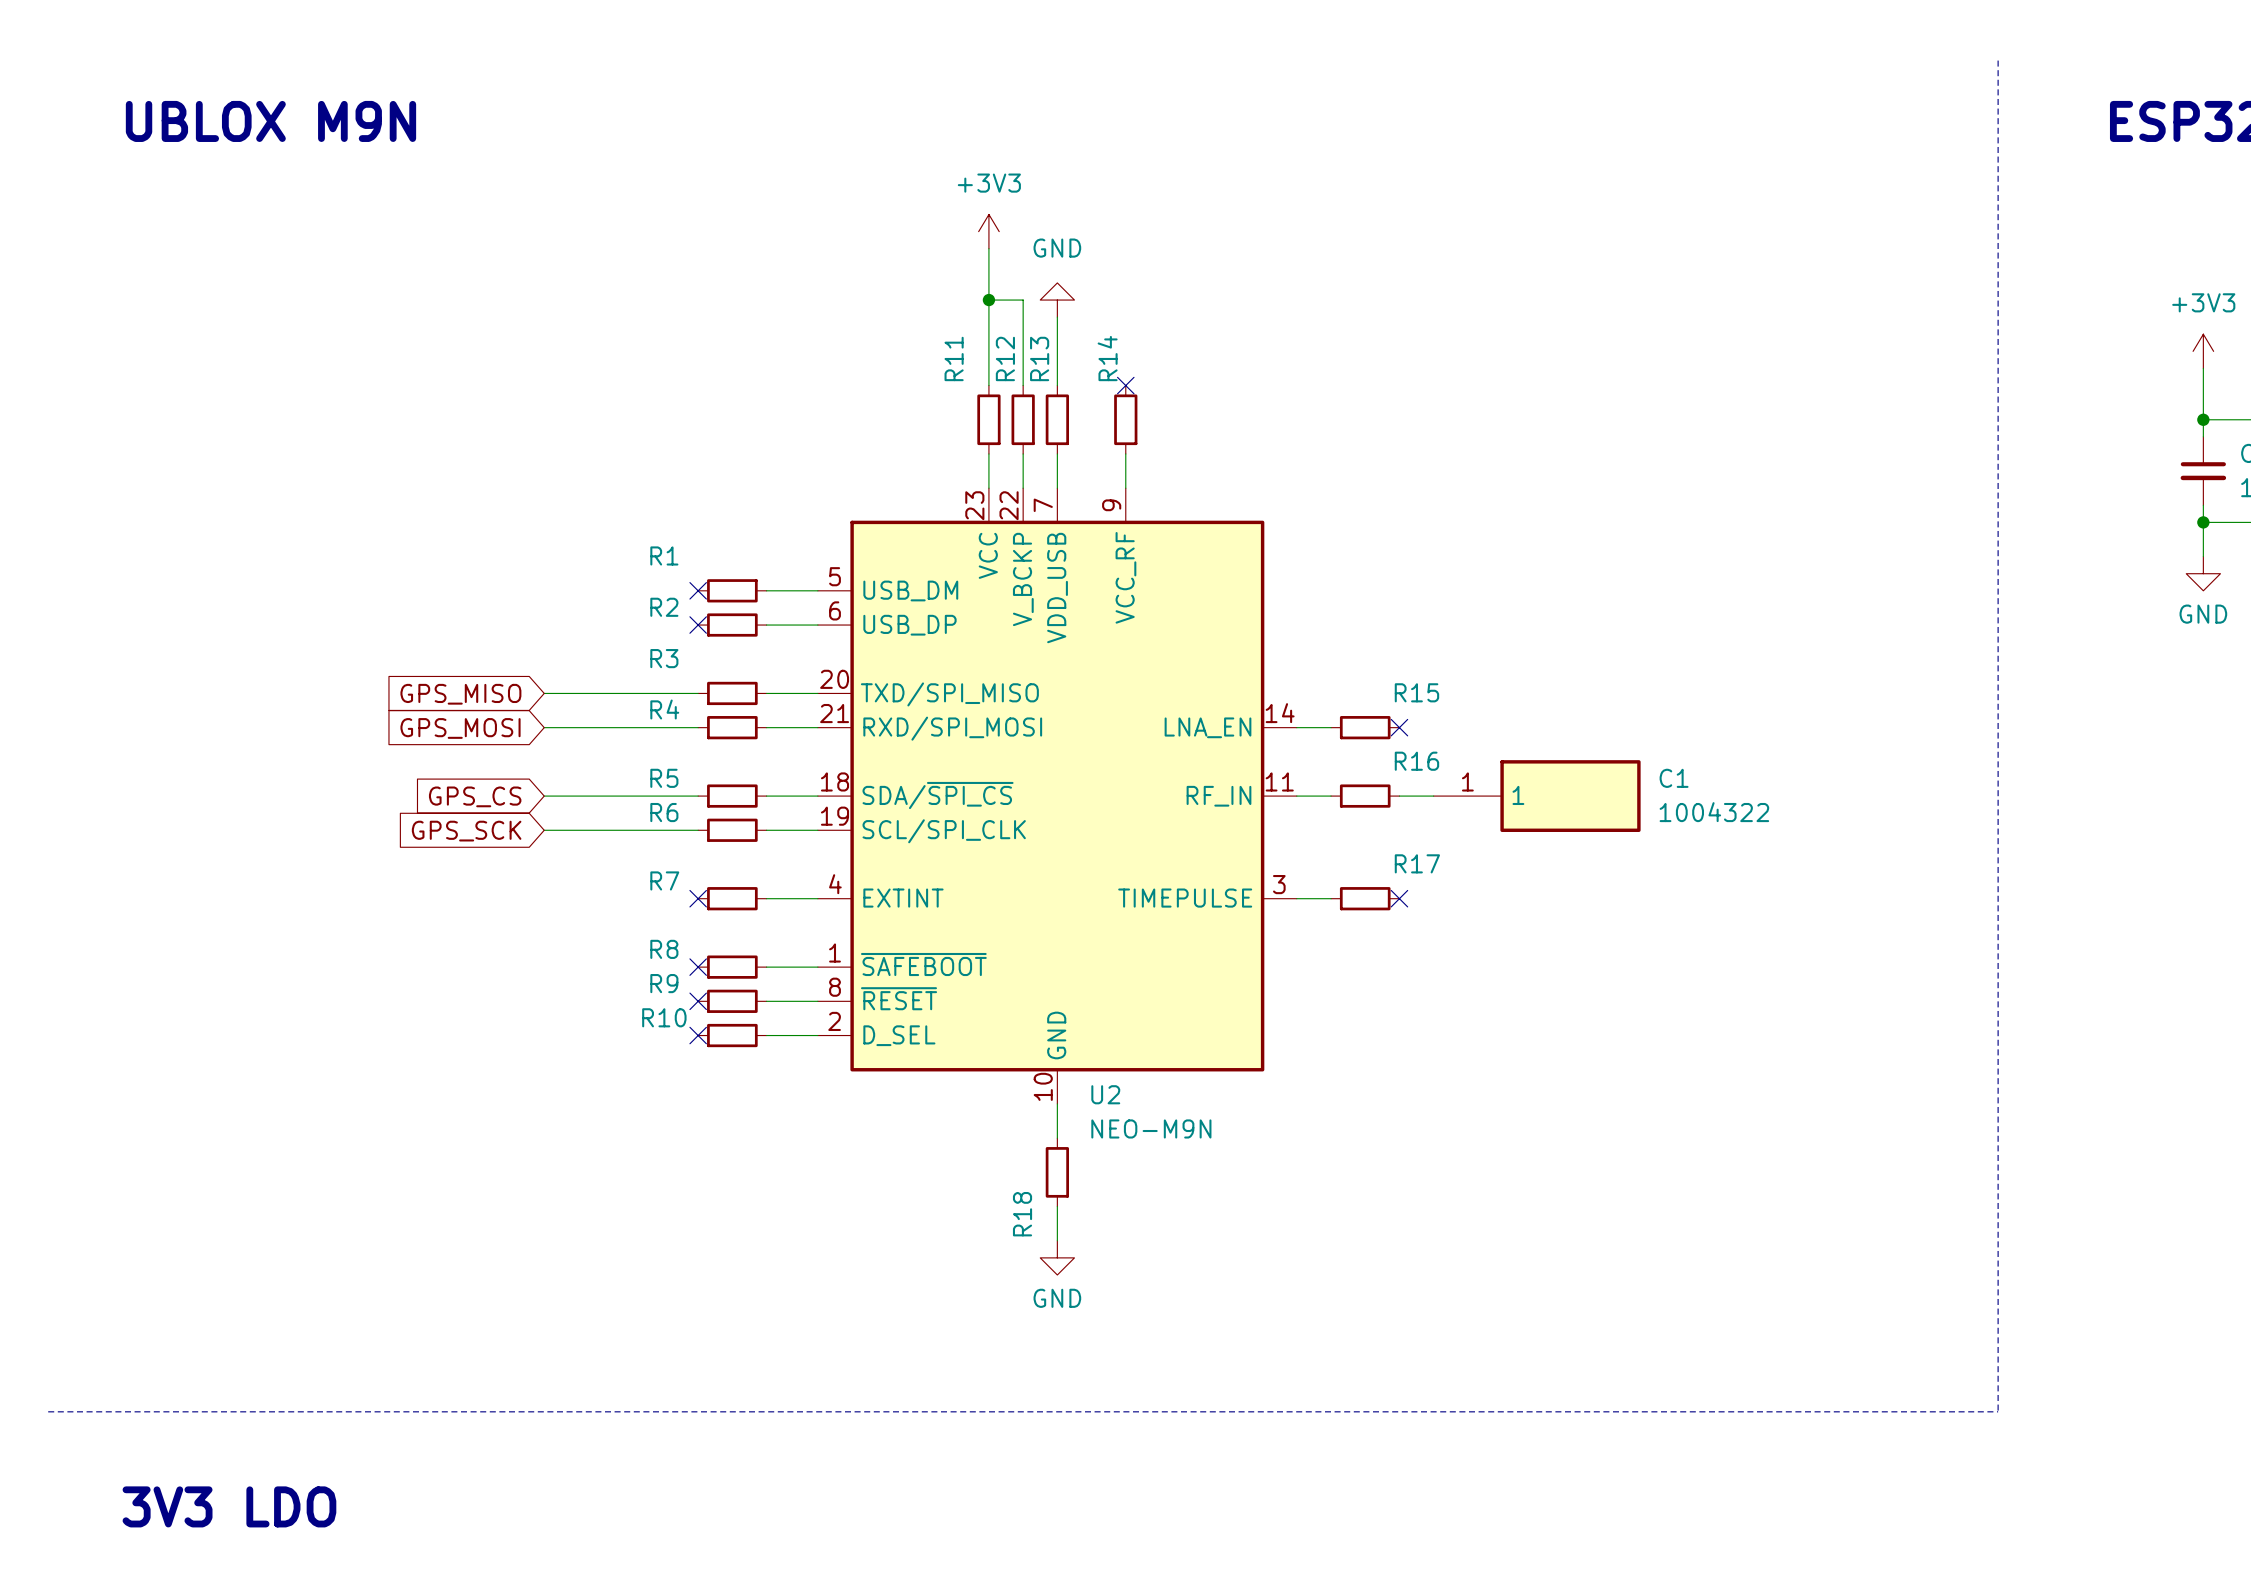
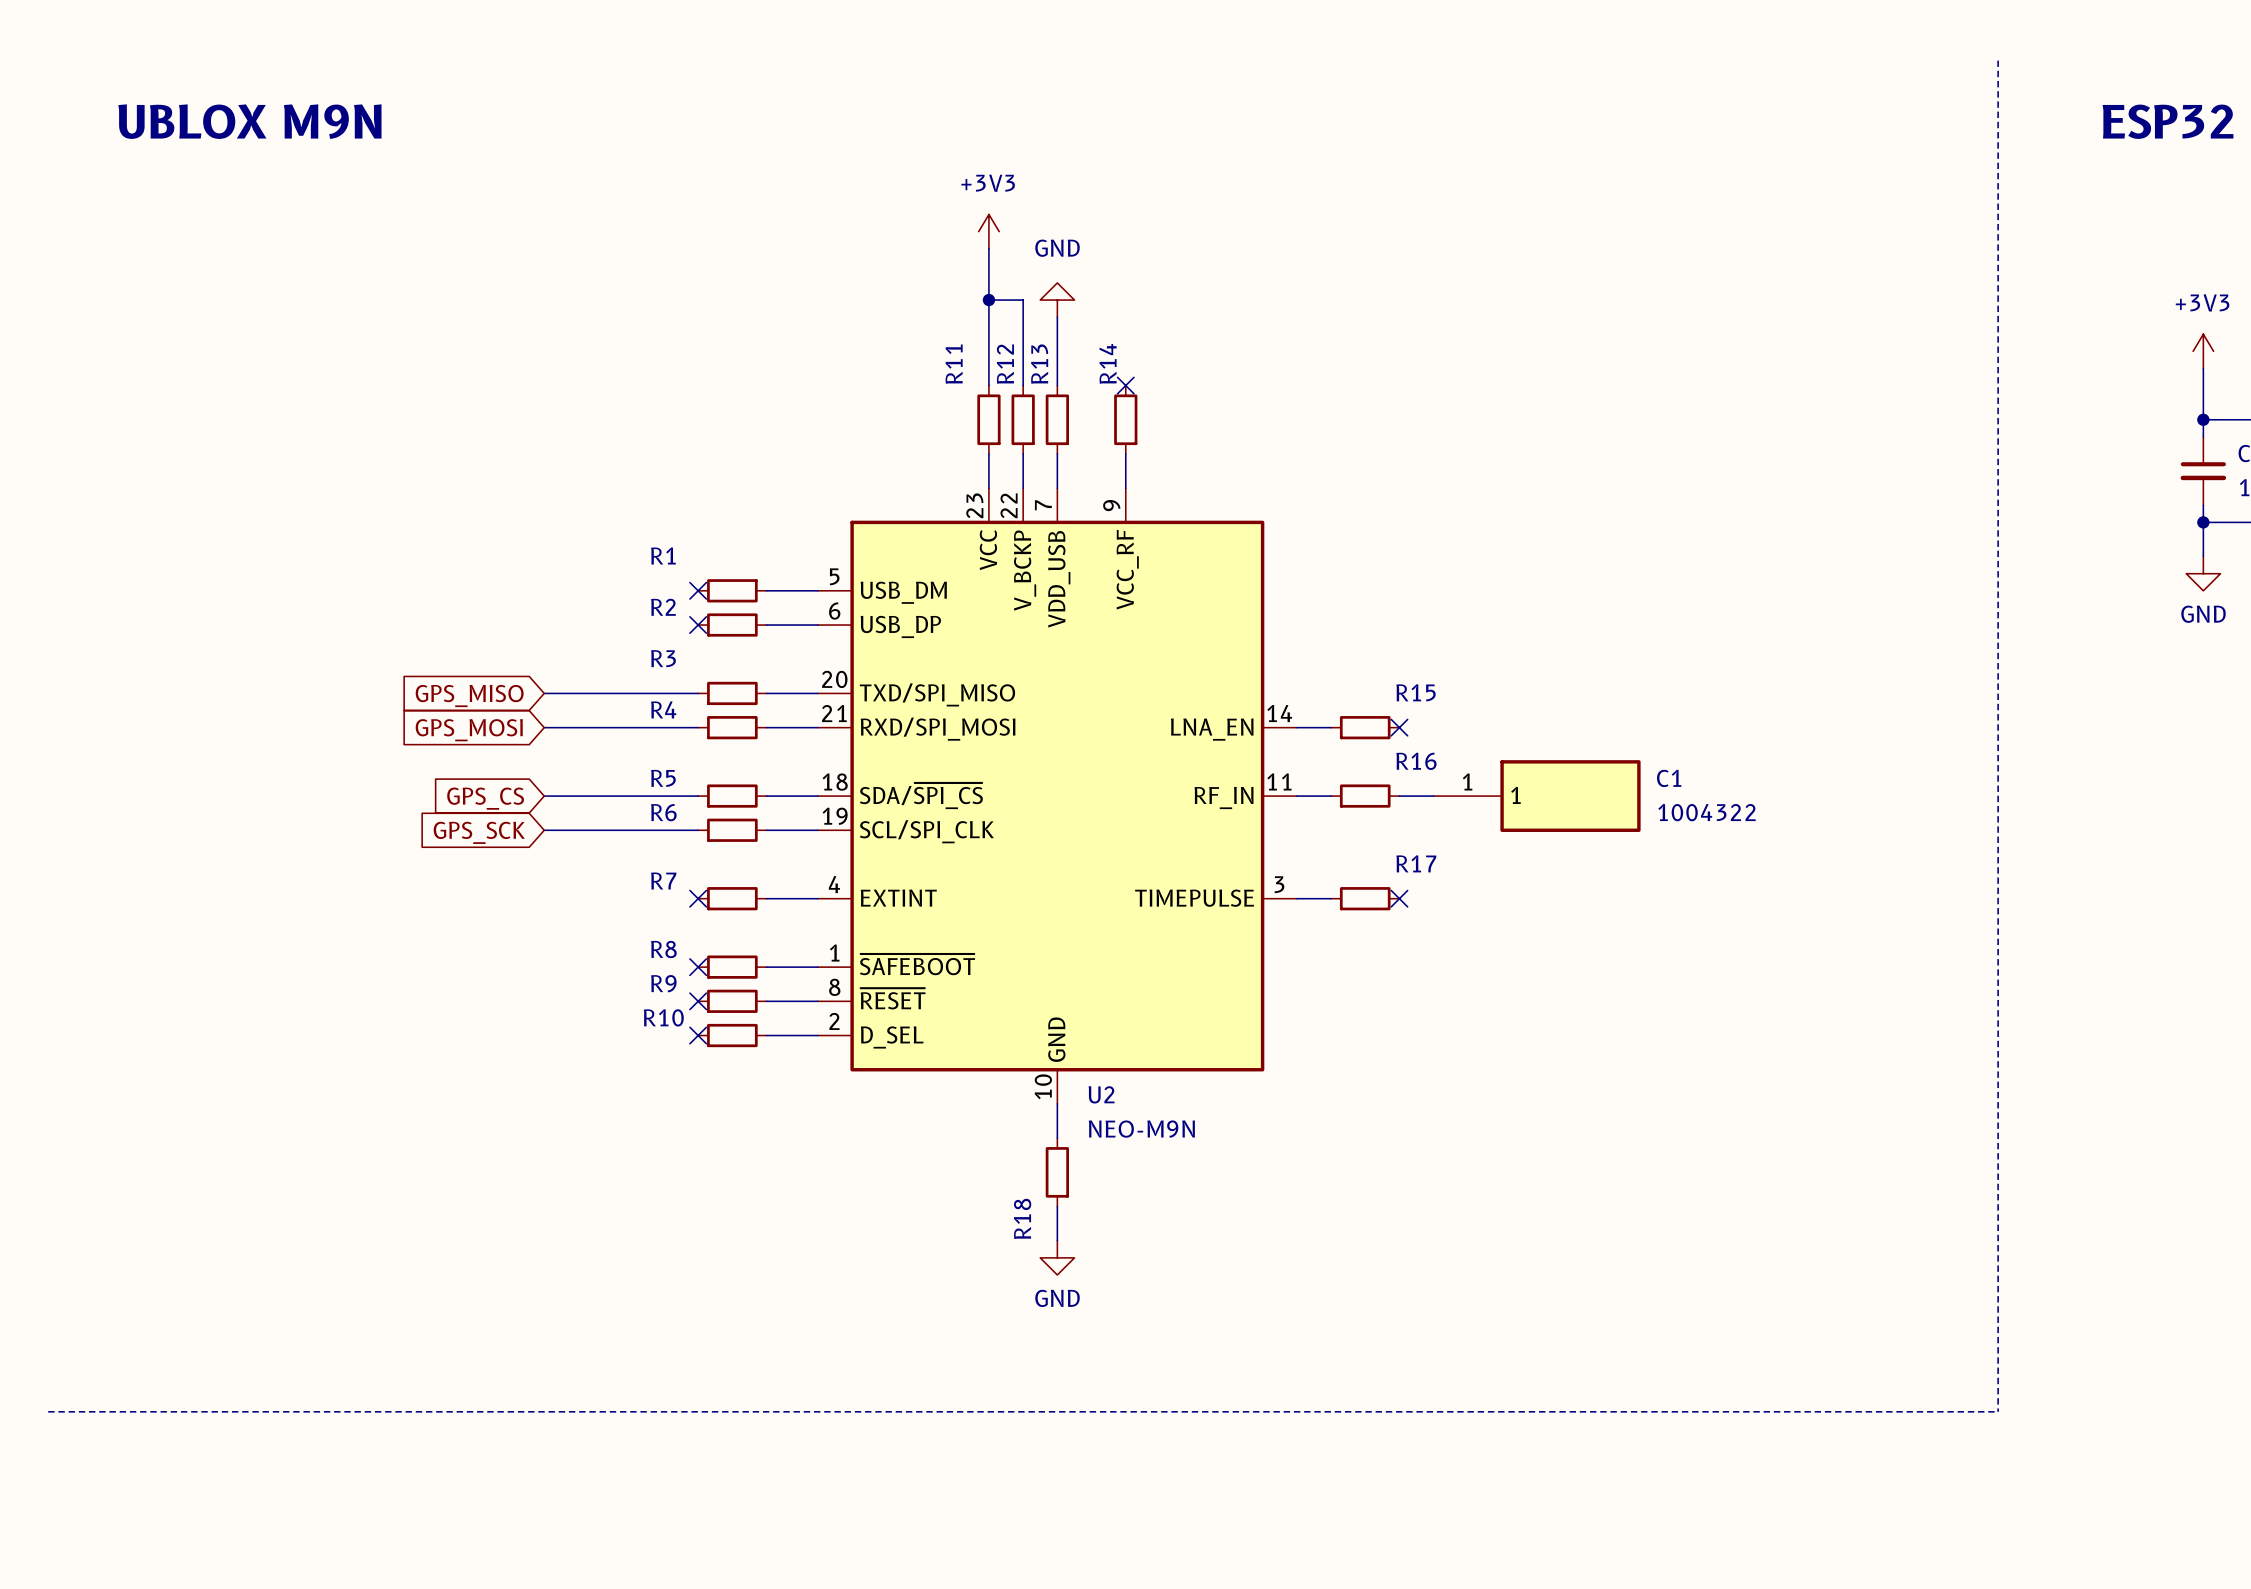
text: 3V3 LDO (229, 1506) -> none

